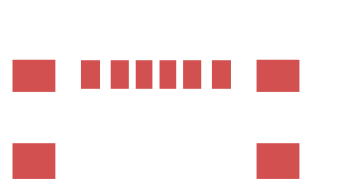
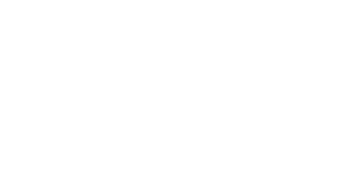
part: (155, 119) -> none

